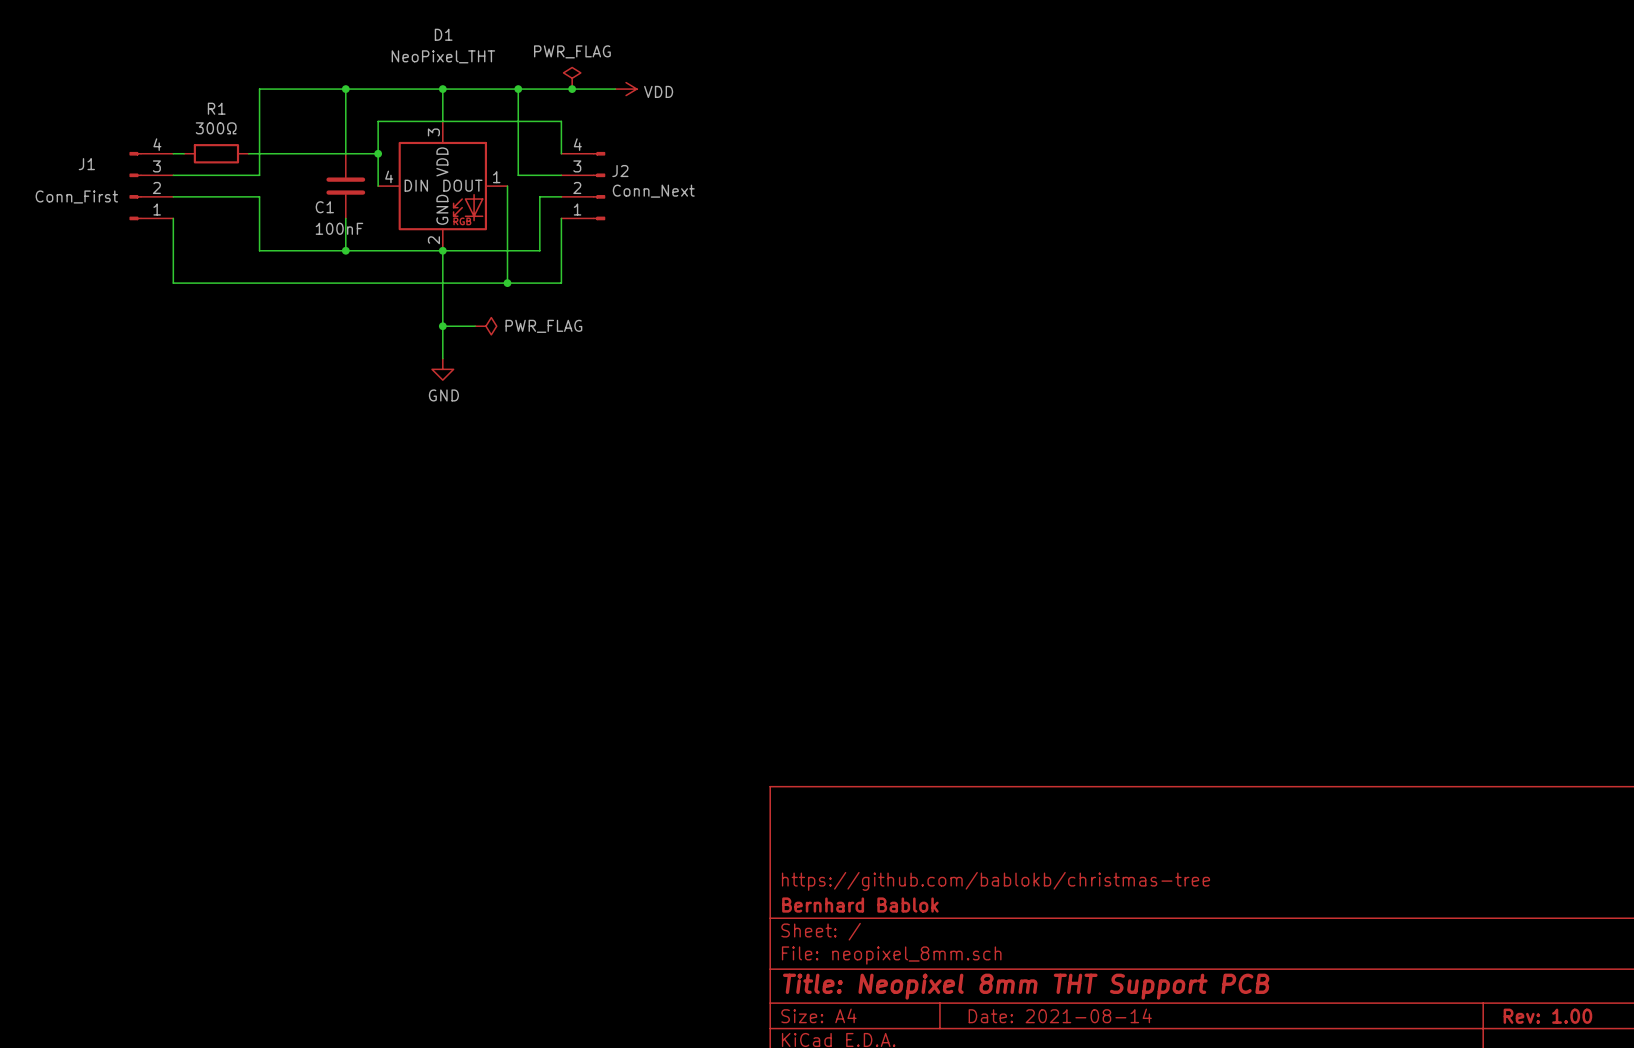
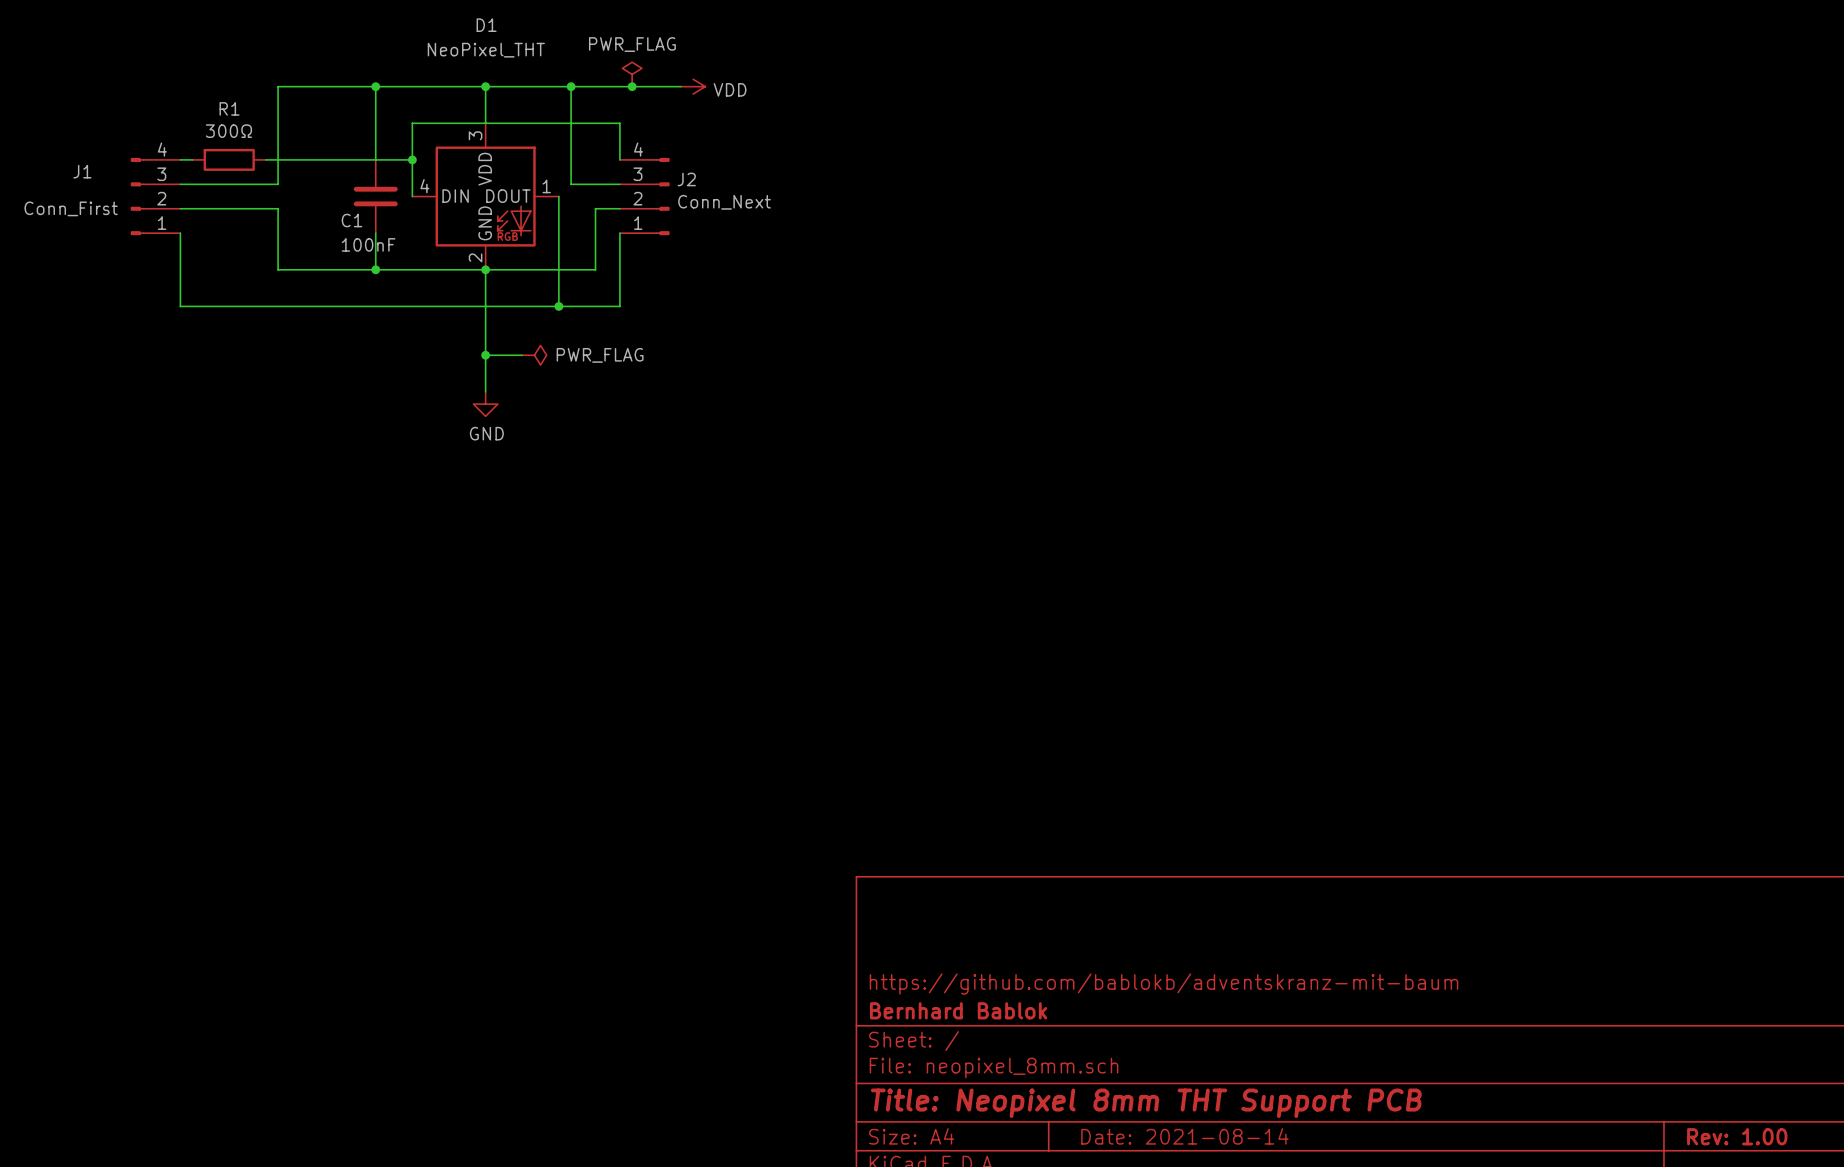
title block: https://github.com/bablokb/christmas-tree (995, 881) -> https://github.com/bablokb/adventskranz-mit-baum (1164, 984)

